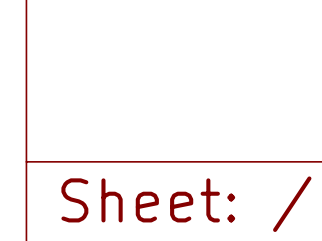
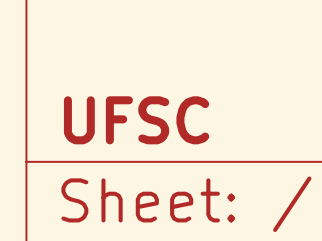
title block: none -> UFSC (136, 120)

